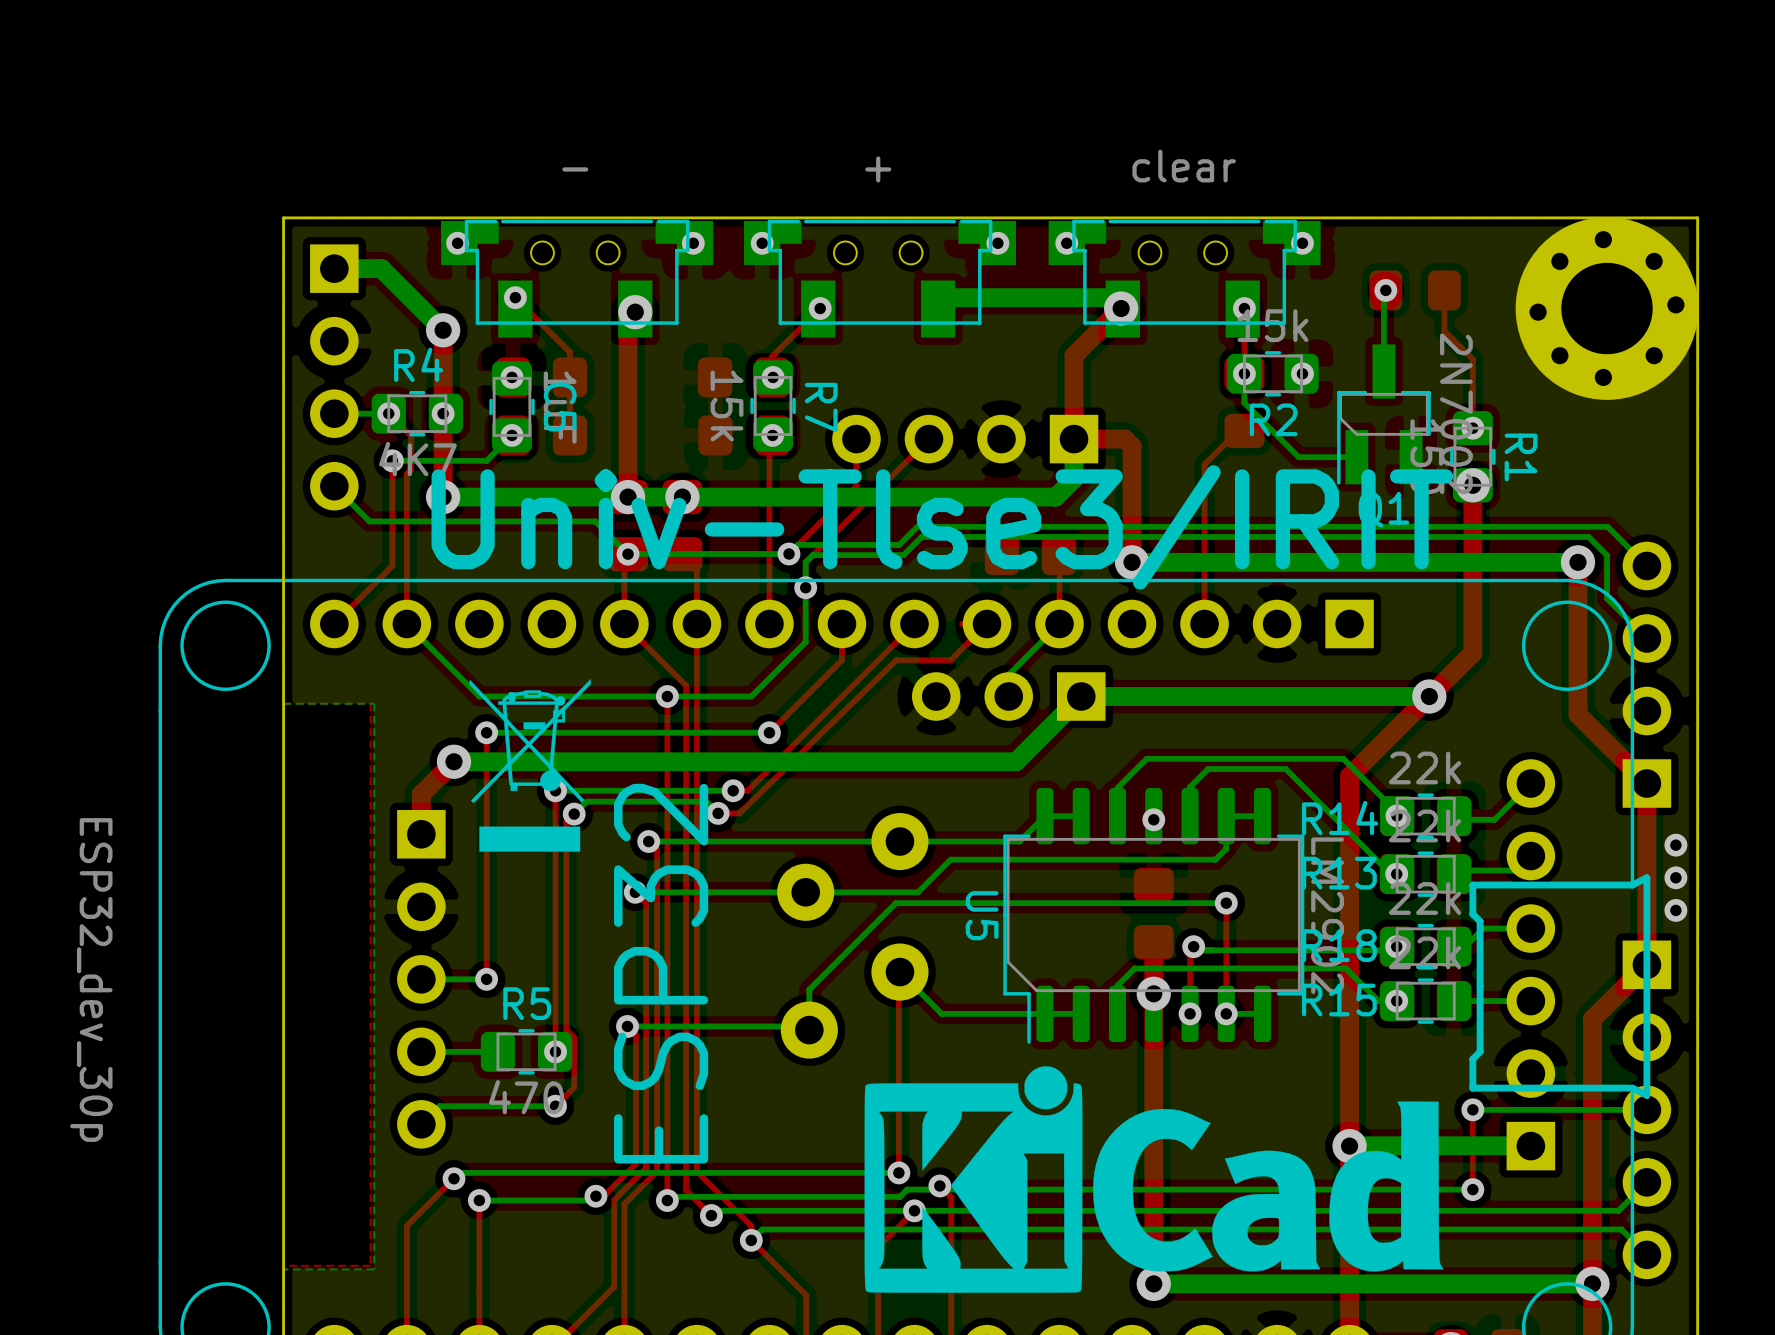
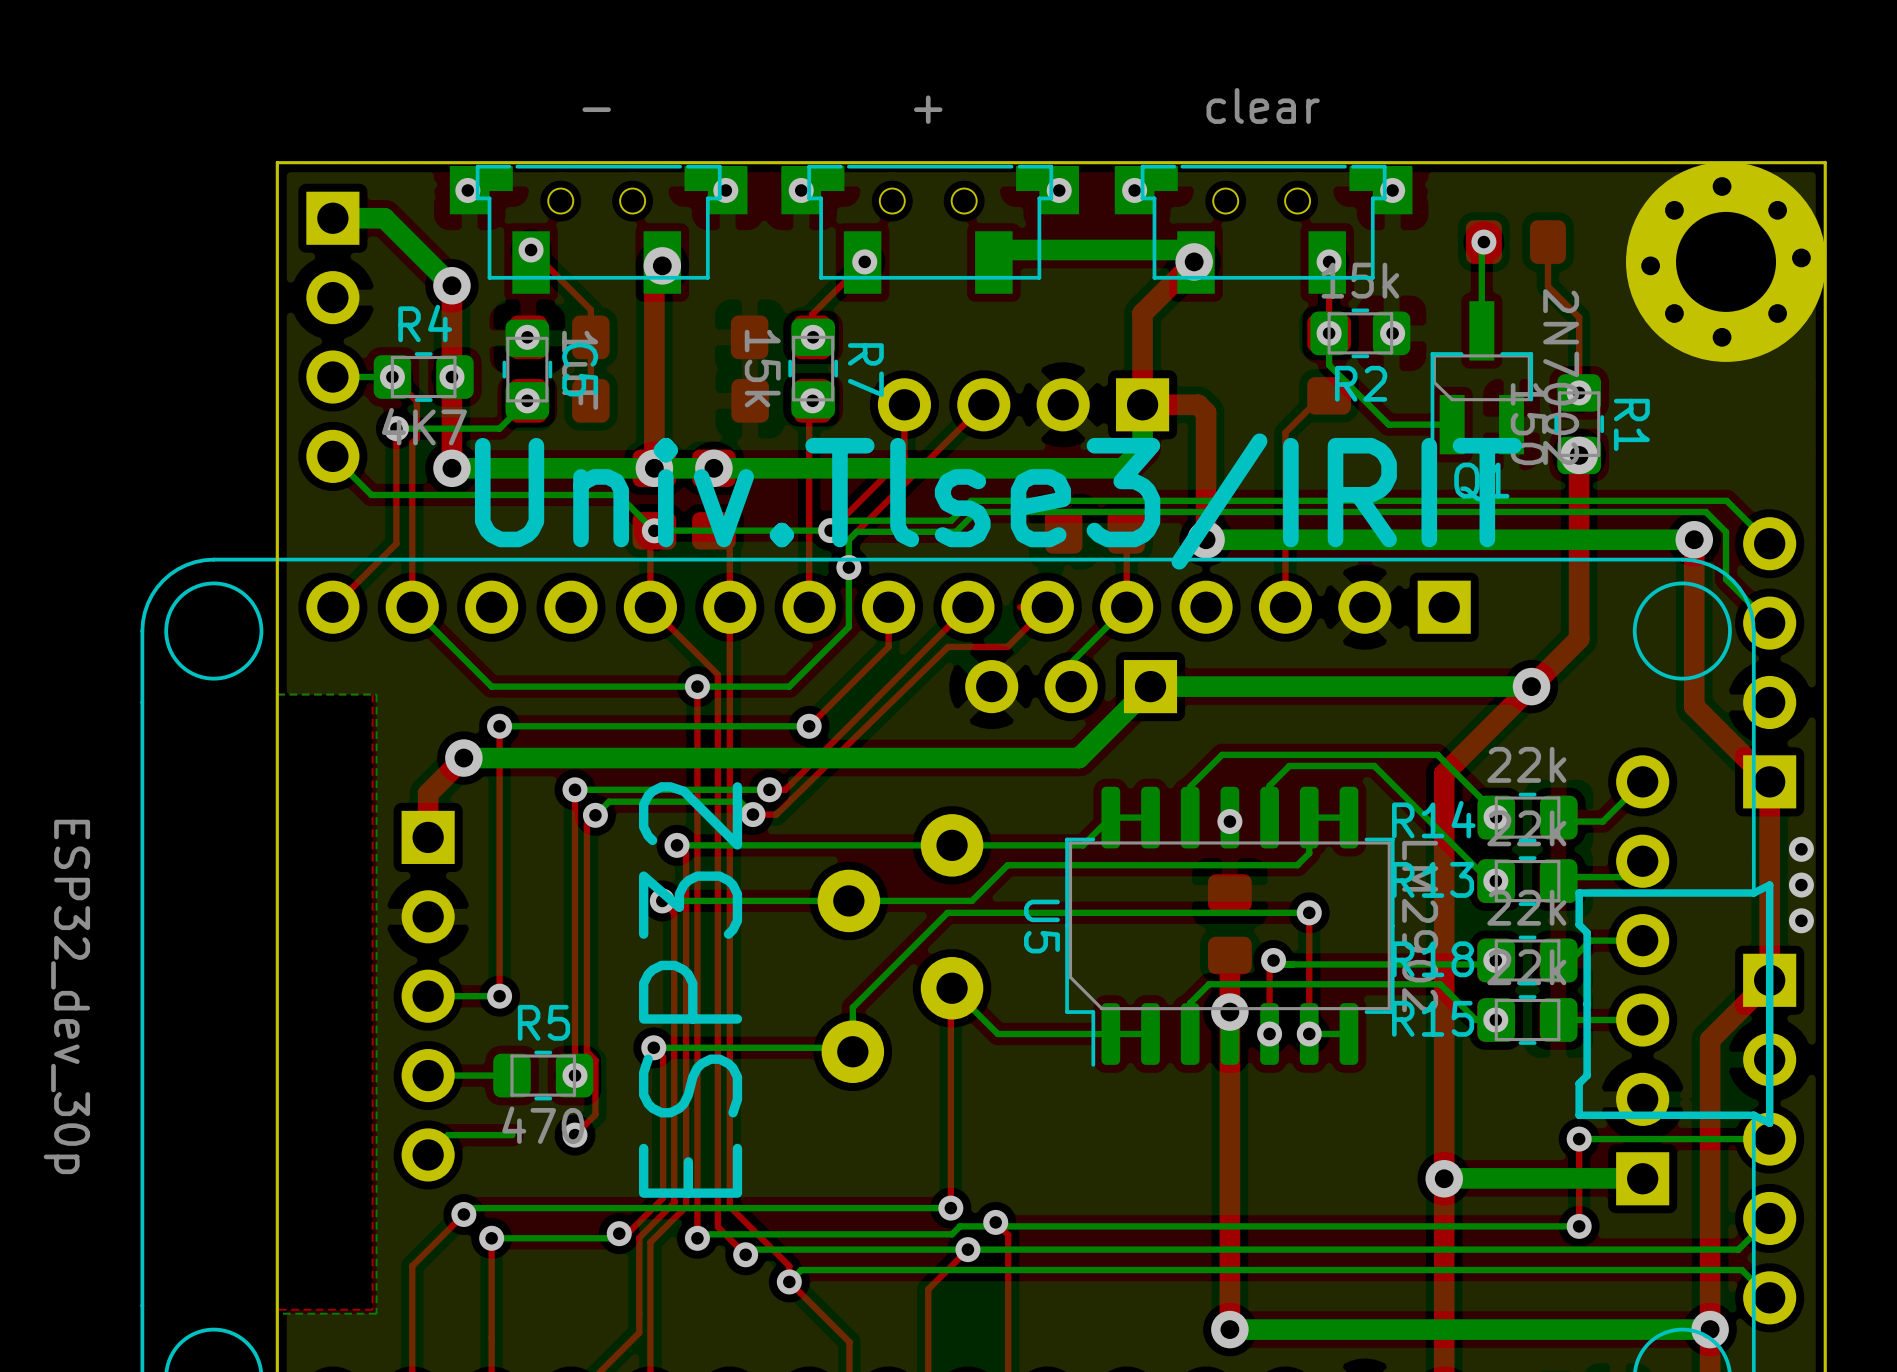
text: Univ-Tlse3/IRIT (942, 527) -> Univ.Tlse3/IRIT (998, 501)
drawing: [469, 678, 591, 852] -> none
drawing: [864, 1066, 1444, 1293] -> none
bottom track: (555, 1106) (498, 1106) -> none

